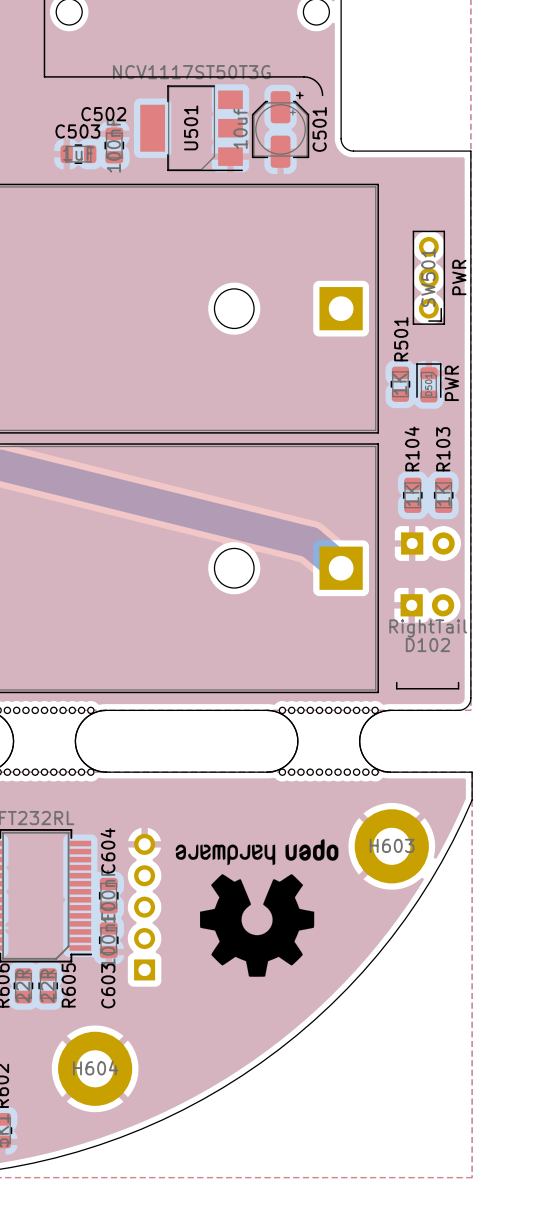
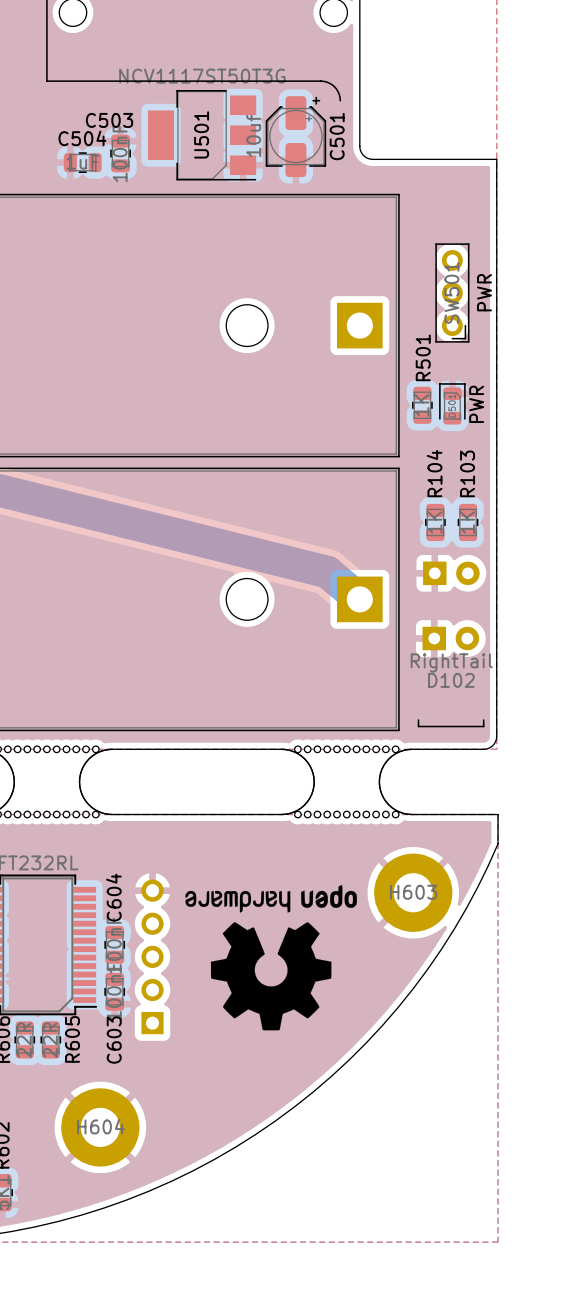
C502 name: C502 (103, 114) -> C503 (109, 120)
C503 name: C503 (77, 131) -> C504 (82, 138)

